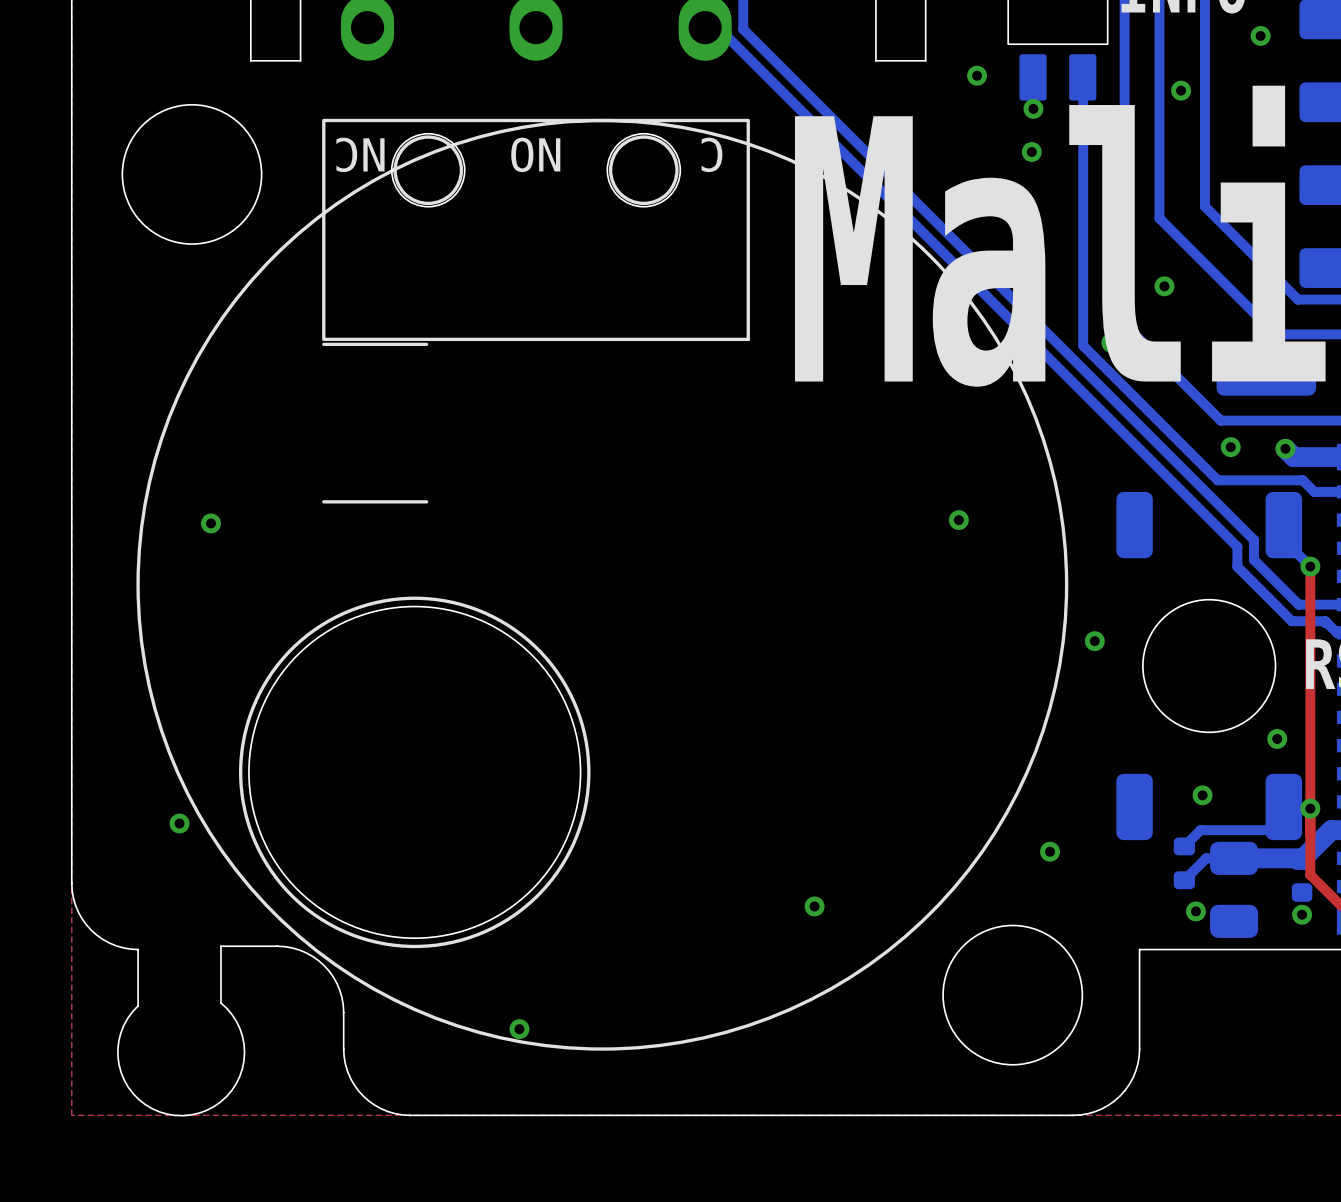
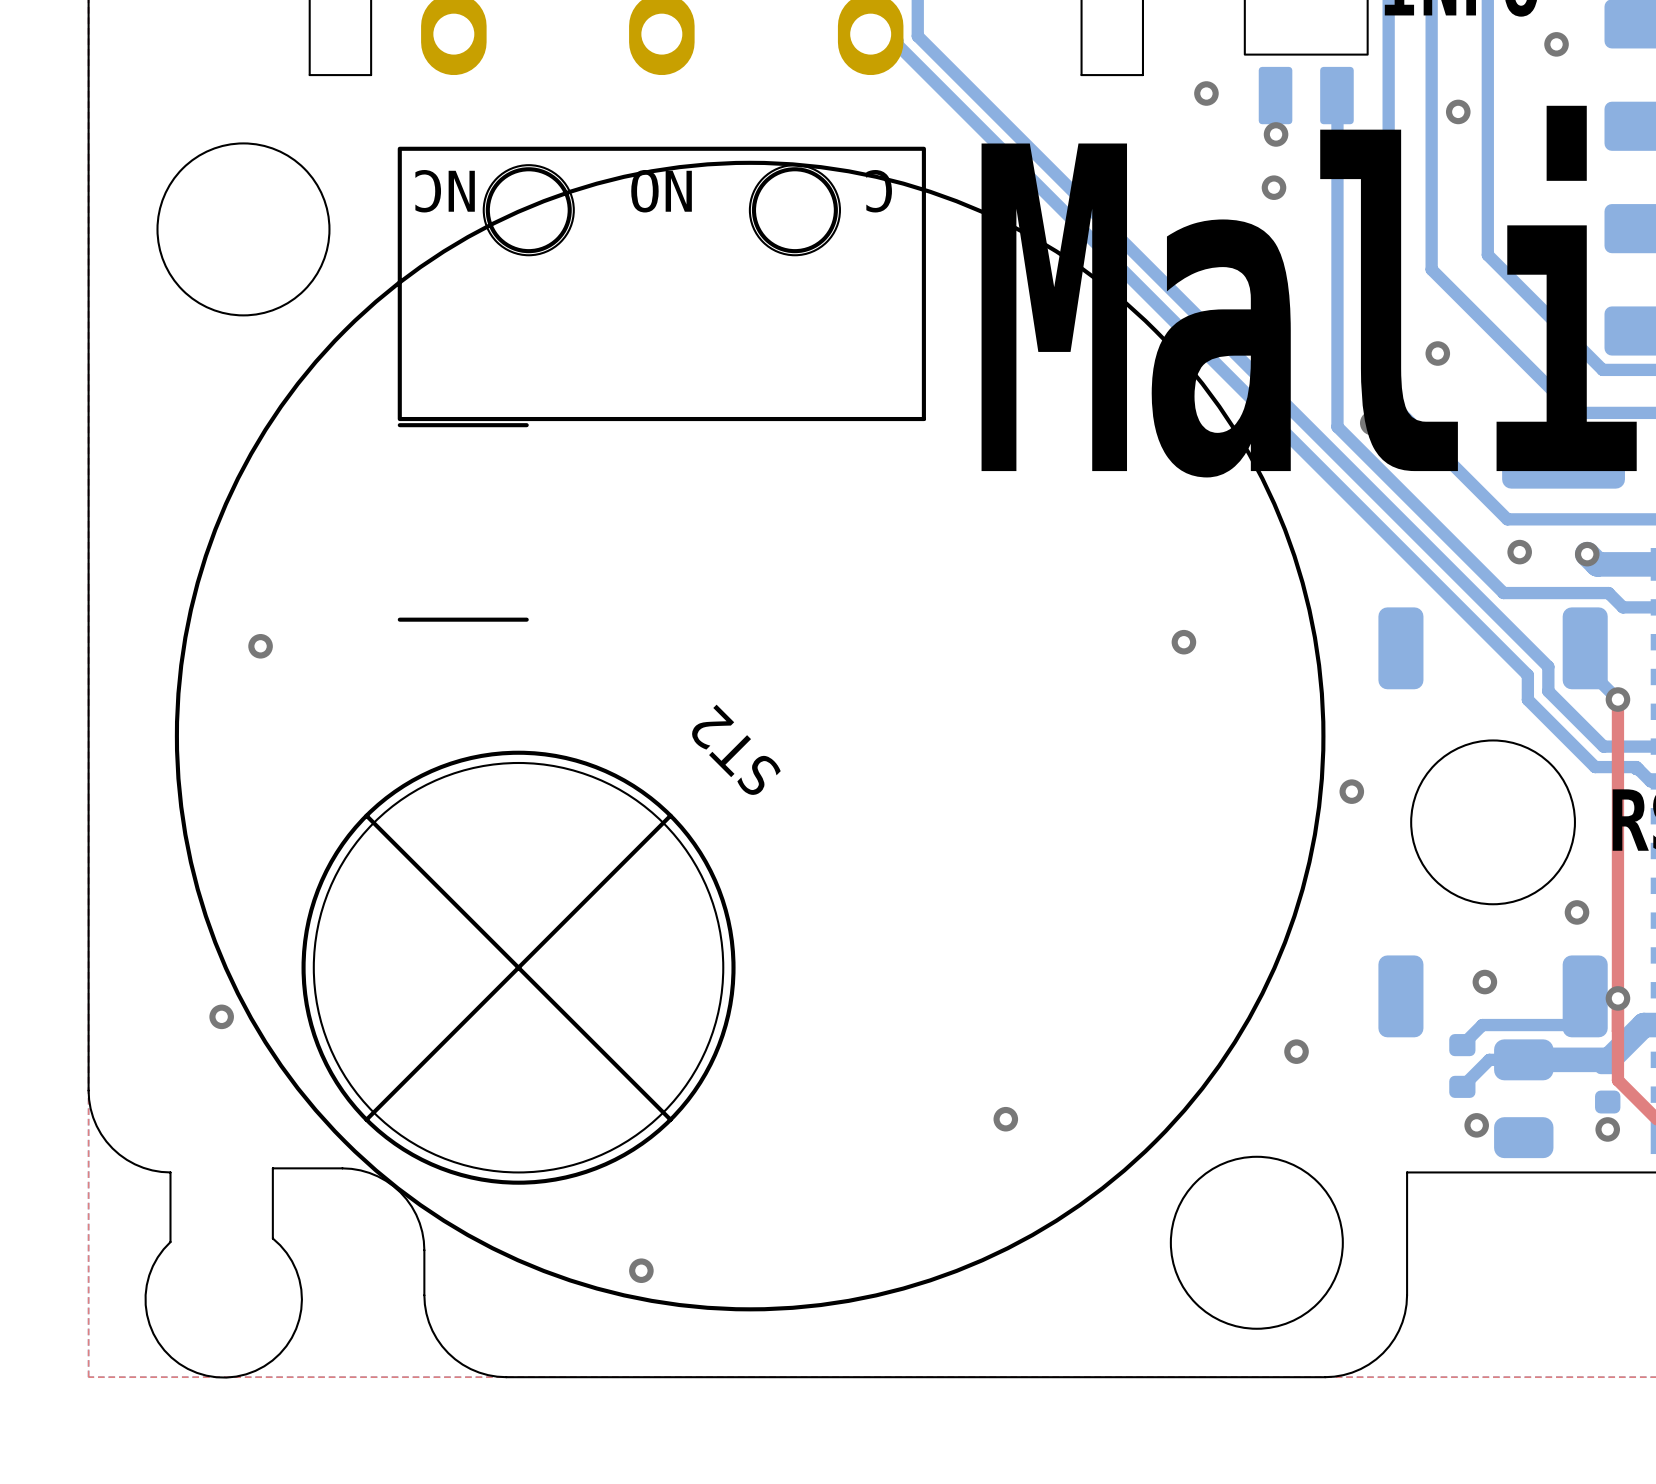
drawing: [121, 103, 1084, 1066] -> none
ST2: none -> (750, 736)

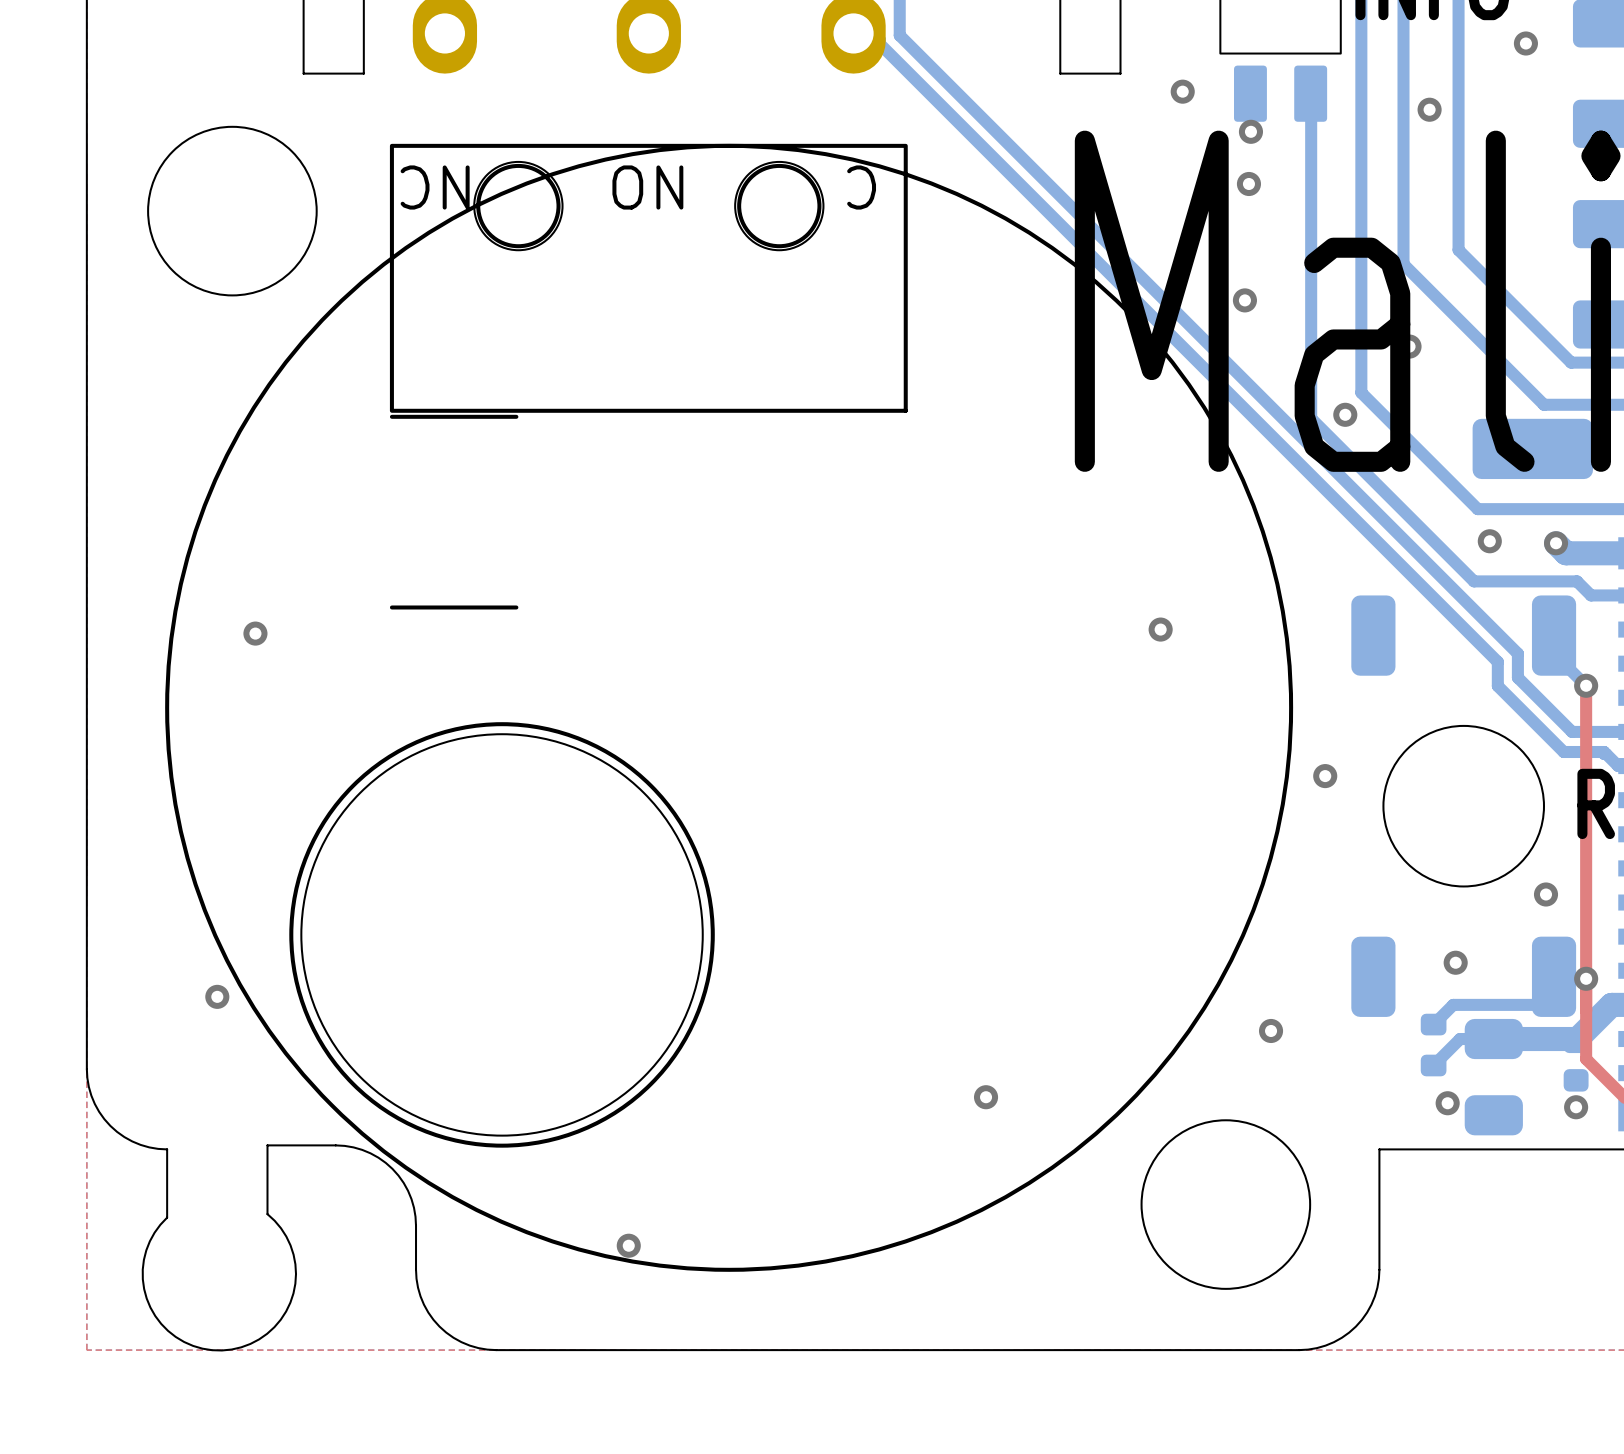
drawing: none -> [147, 125, 1312, 1290]
ST2: (750, 736) -> none

